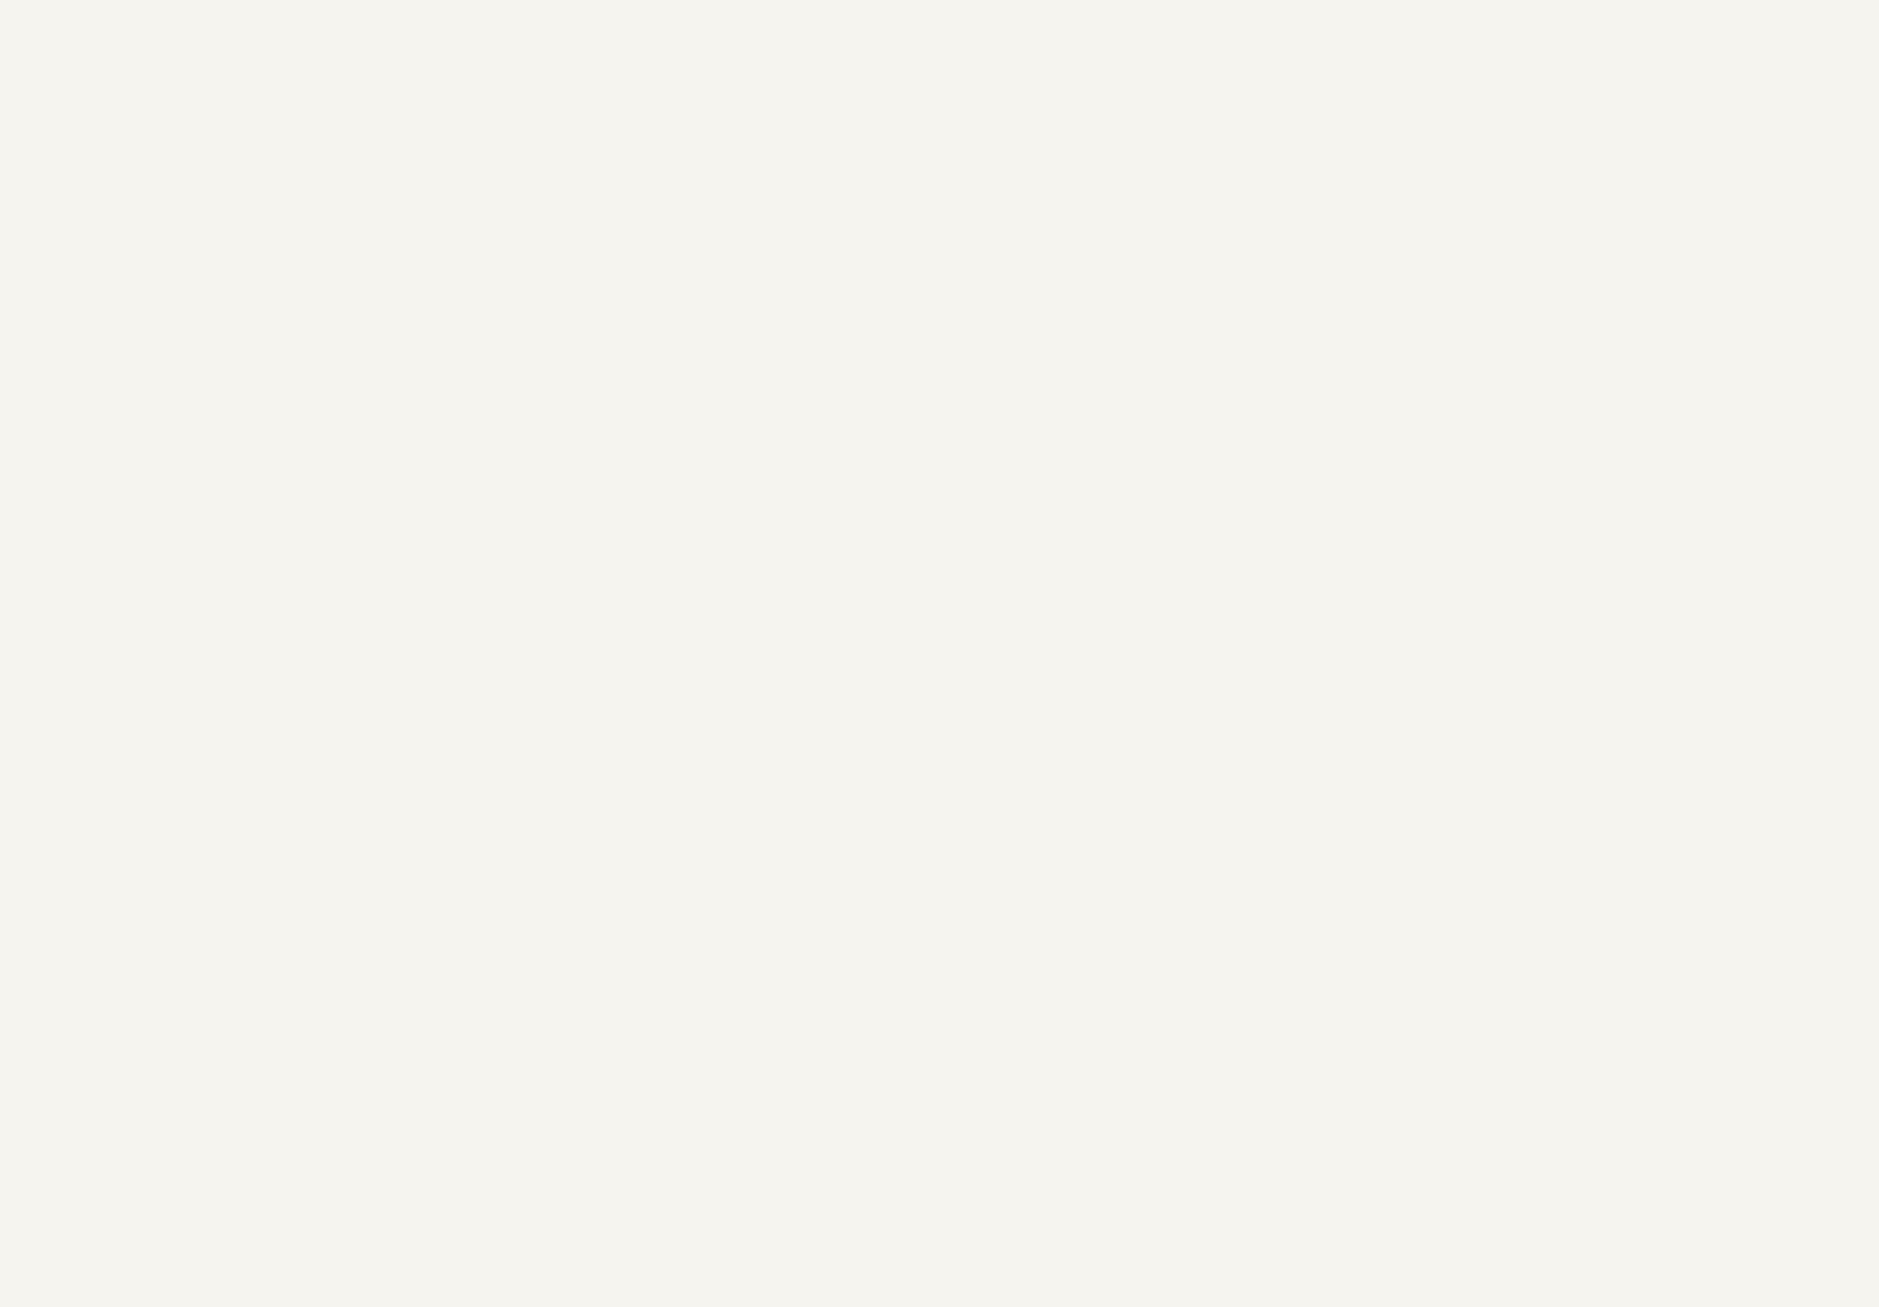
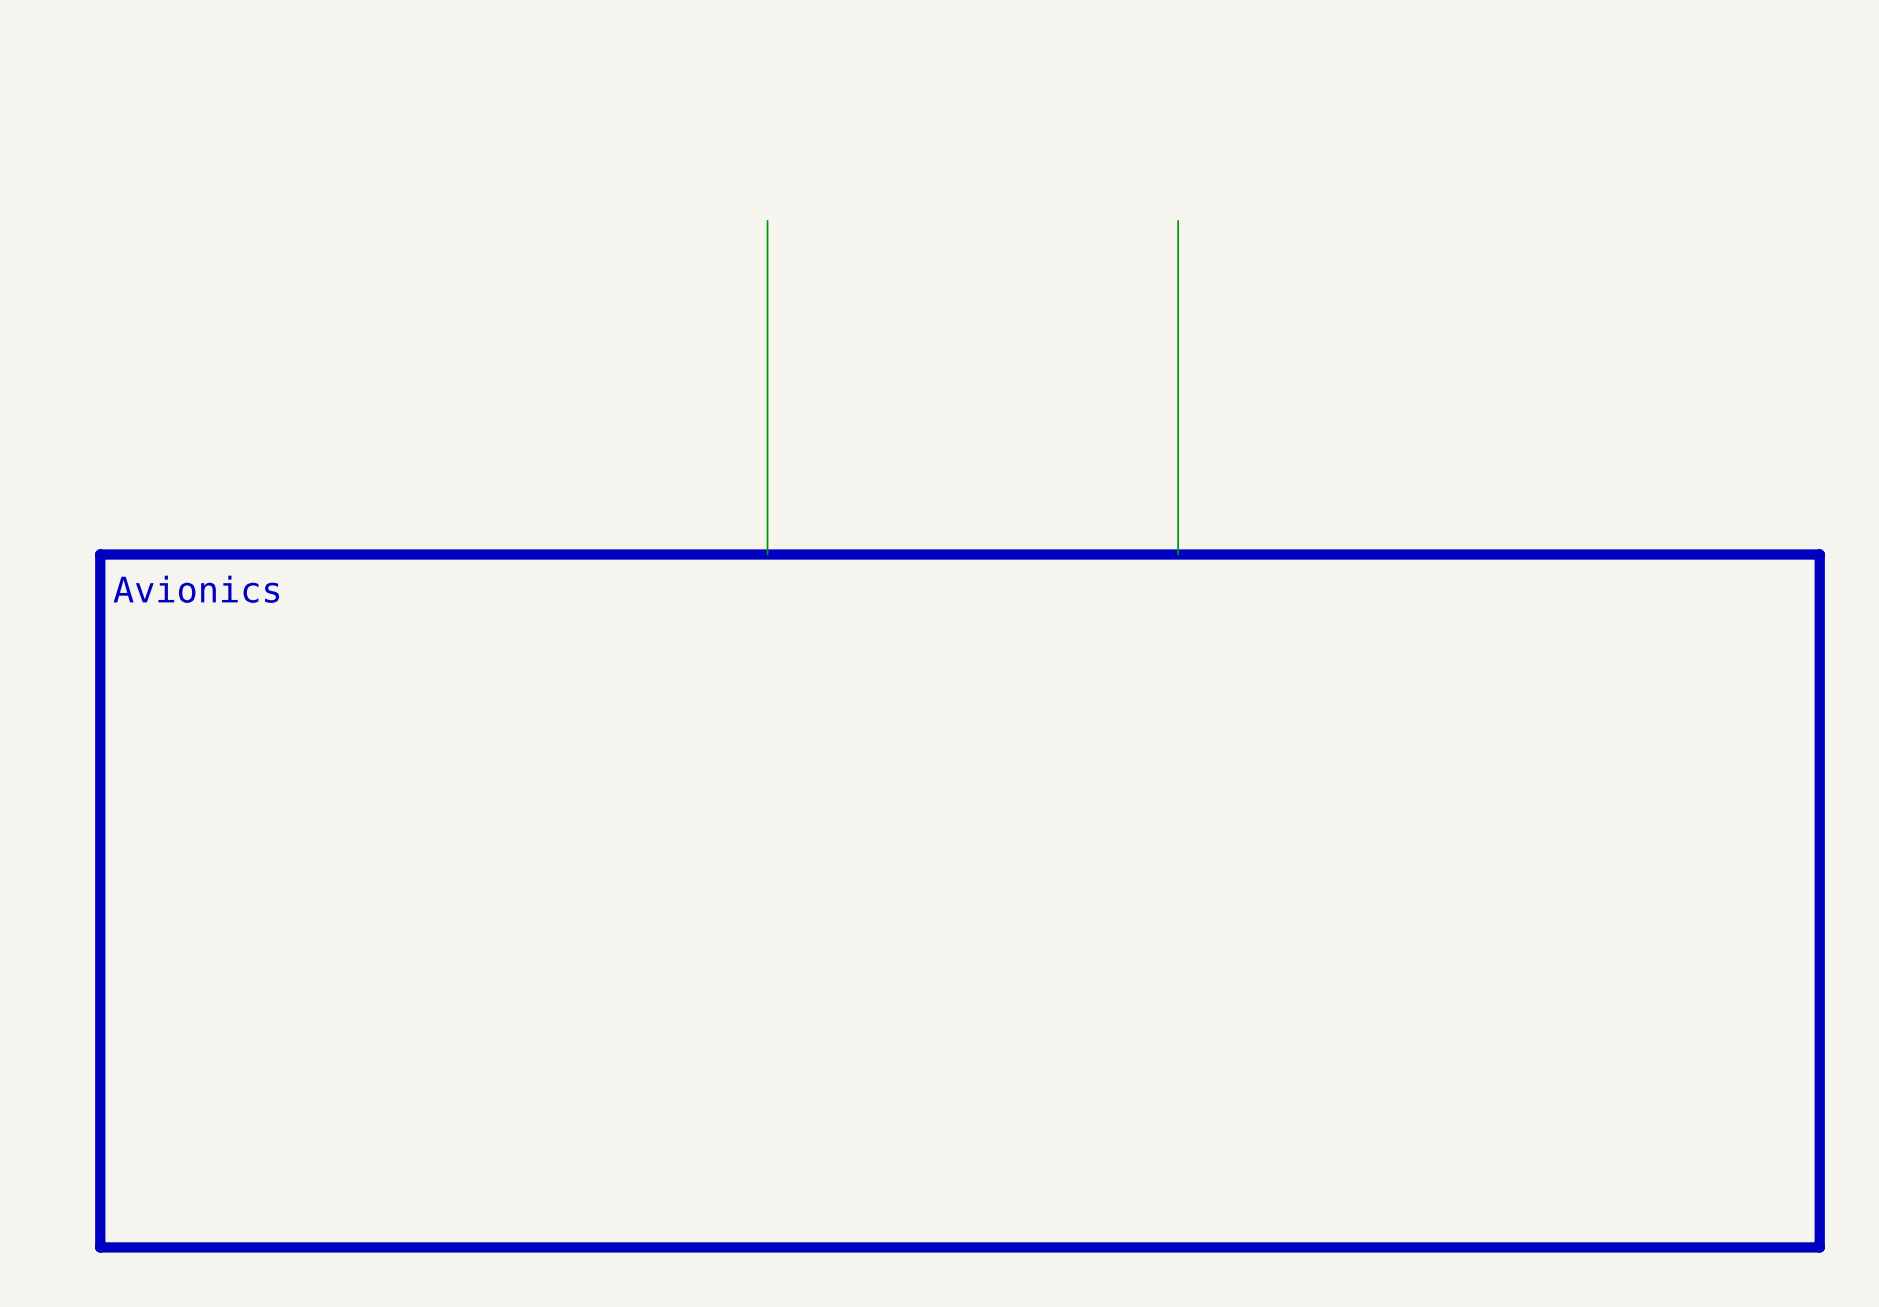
wire: none -> (767, 220) (767, 554)
wire: none -> (1178, 220) (1178, 554)
line: none -> (100, 554) (1819, 554) (1819, 1247) (100, 1247) (100, 554)
text: none -> Avionics (196, 589)

